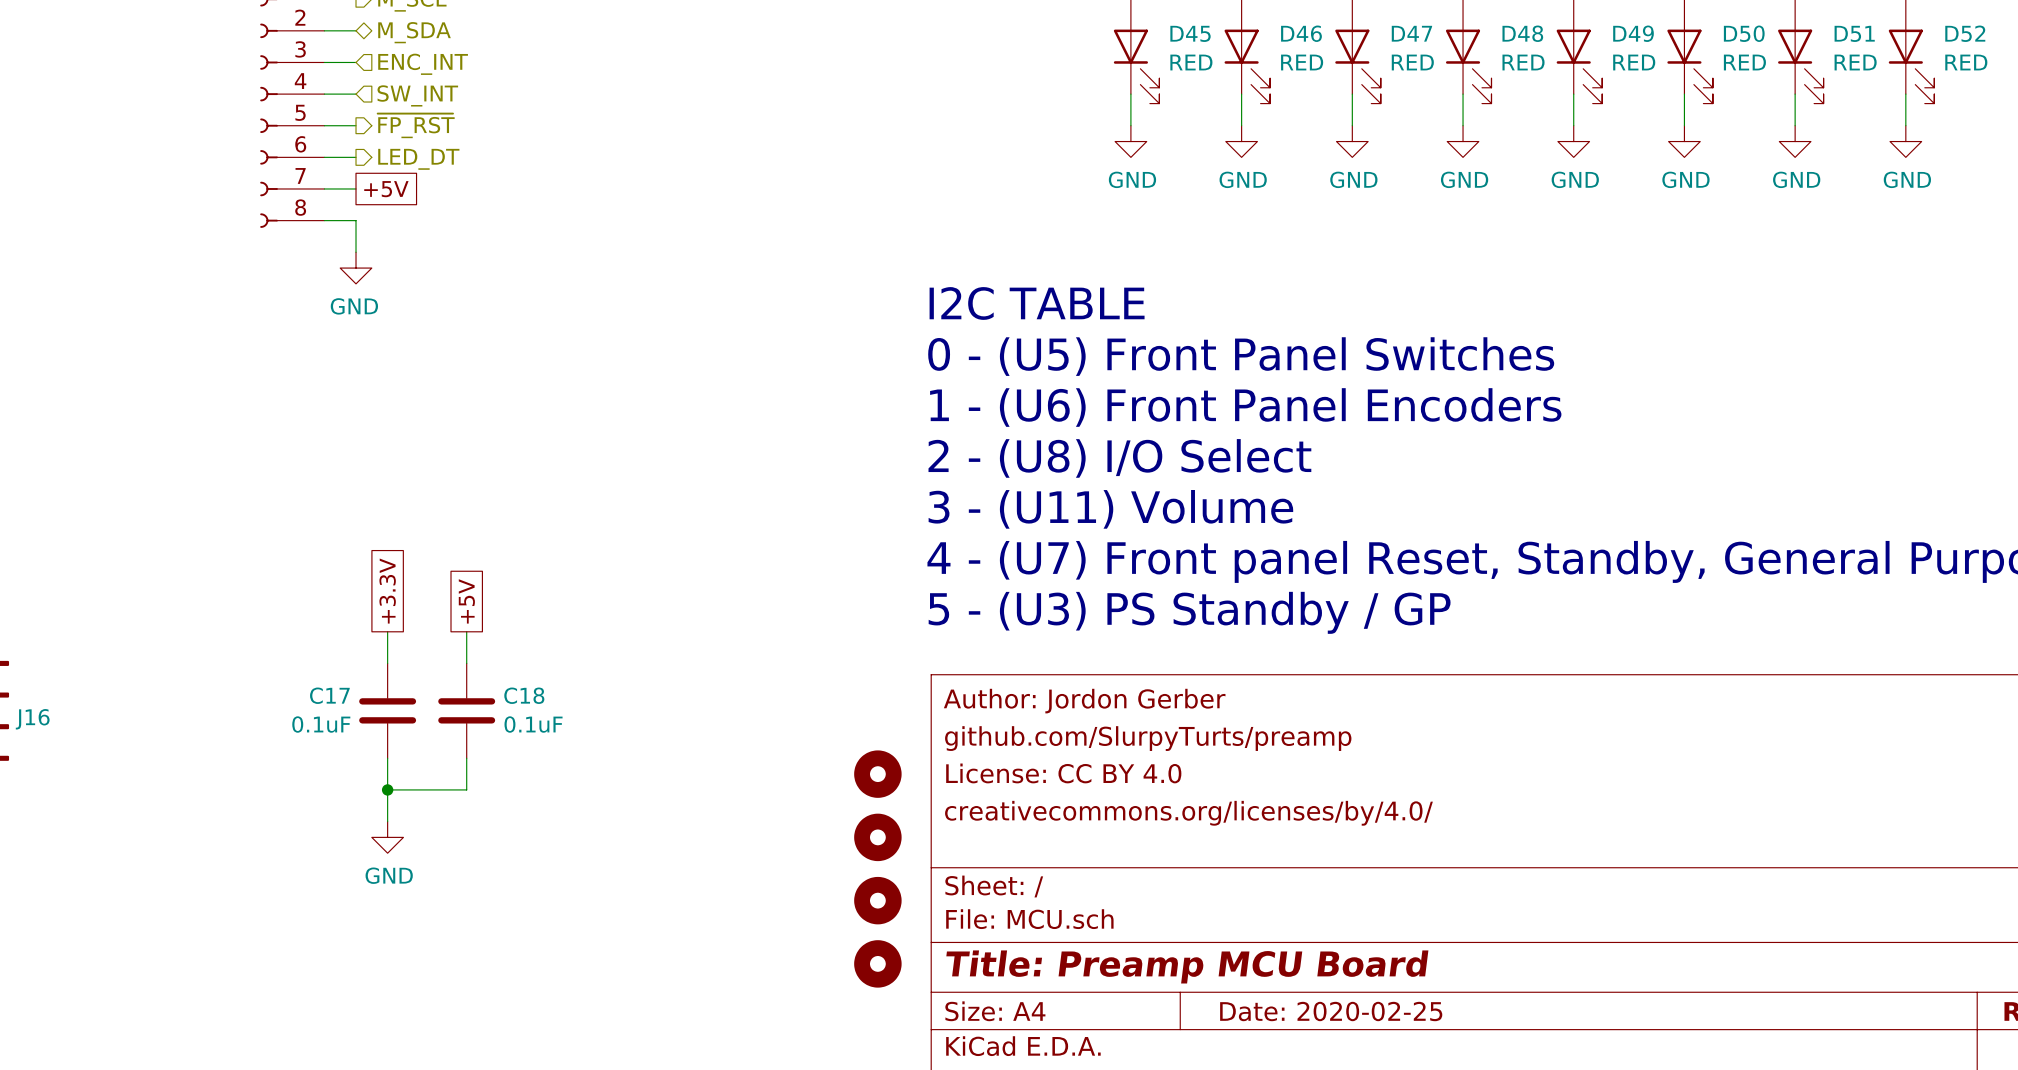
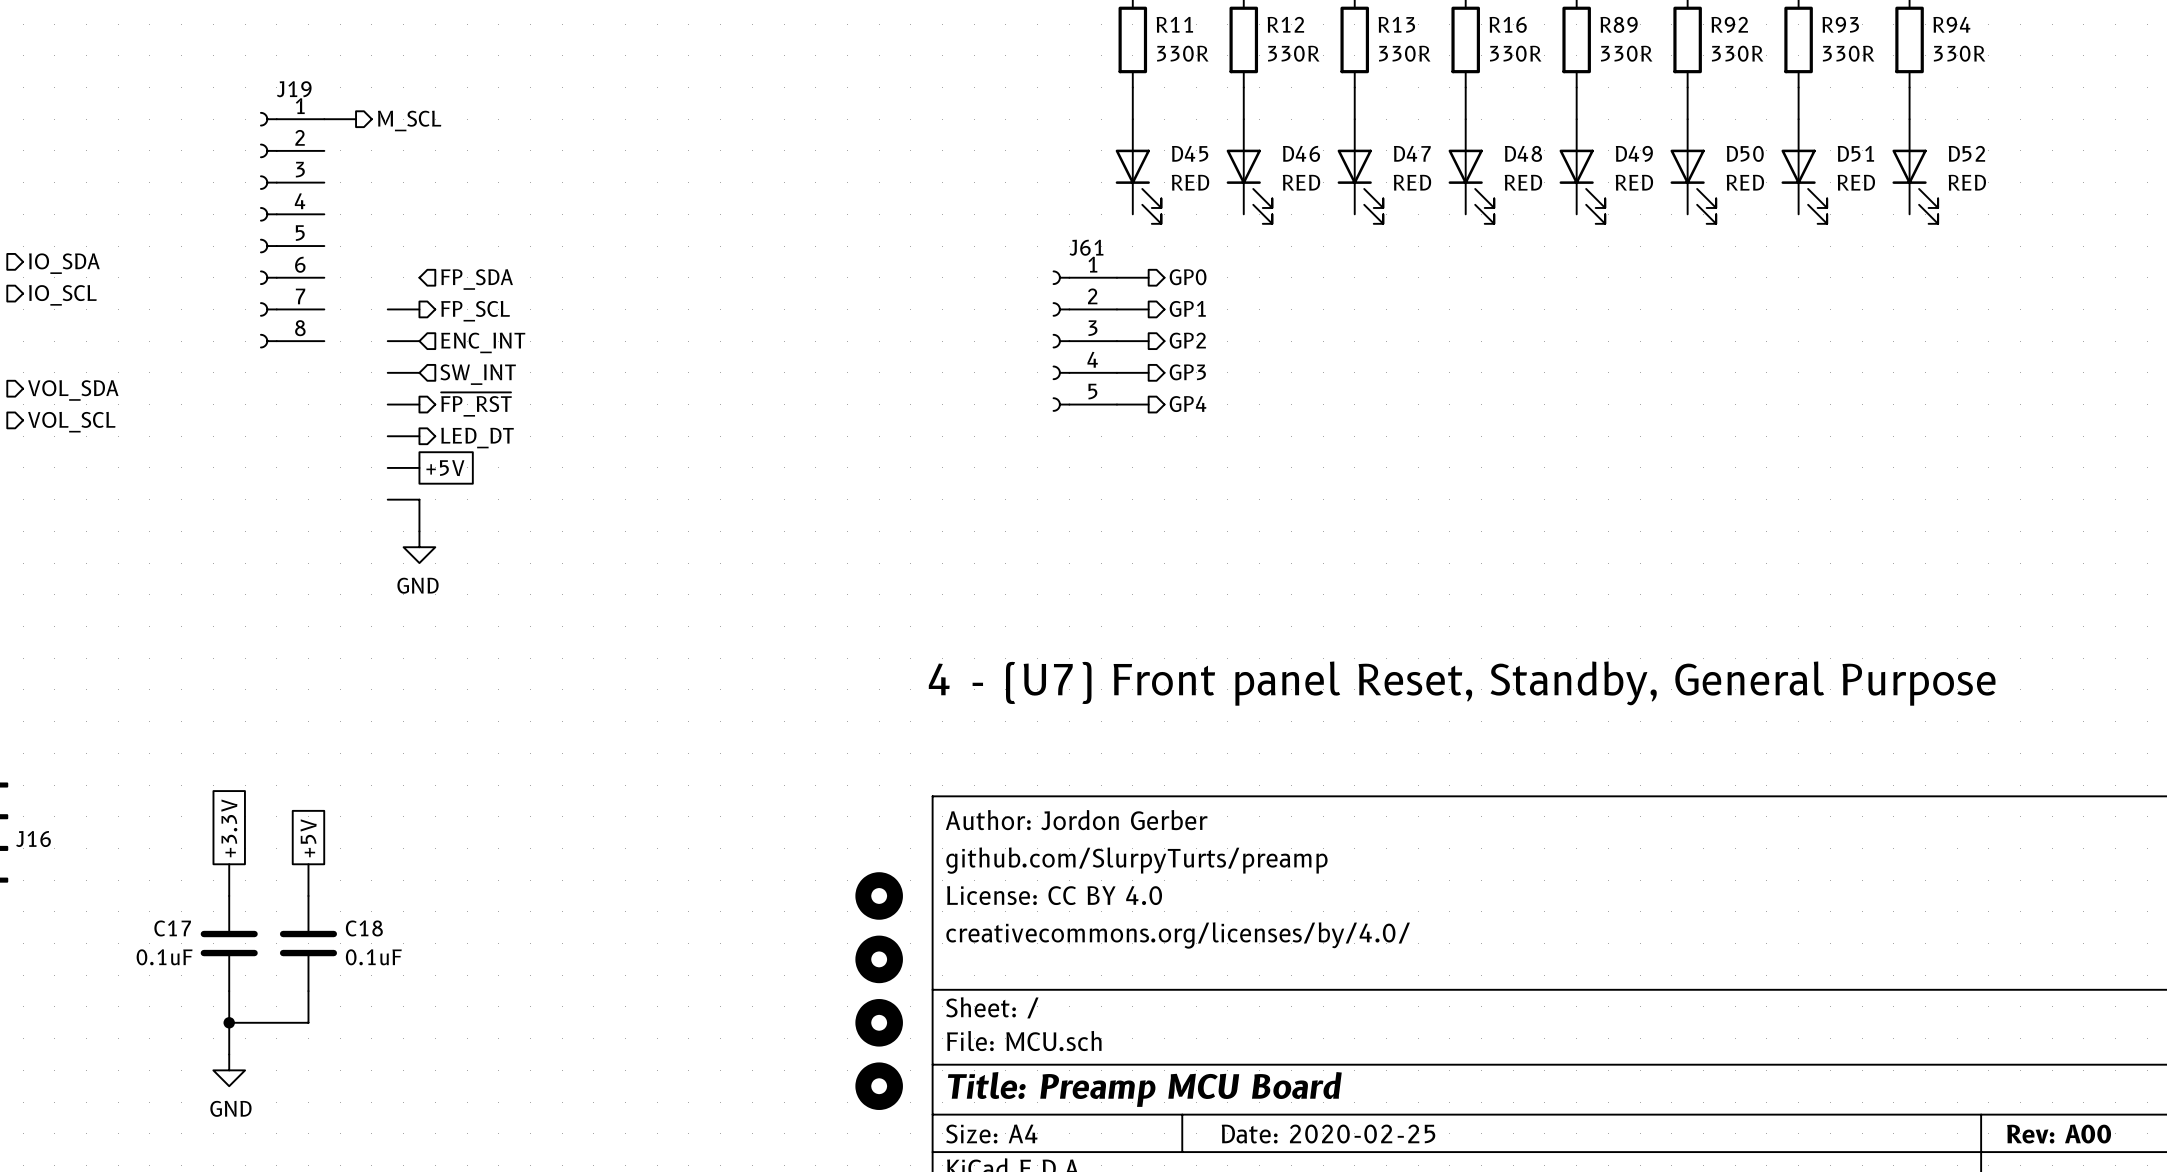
wire: (324, 30) (356, 30) -> (387, 309) (419, 309)
hierarchical label: M_SDA (414, 32) -> none
wire: (324, 62) (356, 62) -> (387, 341) (419, 341)
hierarchical label position: ENC_INT (423, 64) -> ENC_INT (483, 342)
wire: (324, 94) (356, 94) -> (387, 372) (419, 372)
wire: (1130, 94) (1130, 125) -> none
wire: (1241, 94) (1241, 125) -> none
wire: (1352, 94) (1352, 125) -> none
wire: (1463, 94) (1463, 125) -> none
wire: (1573, 94) (1573, 125) -> none
wire: (1684, 94) (1684, 125) -> none
wire: (1795, 94) (1795, 125) -> none
wire: (1905, 94) (1905, 125) -> none
hierarchical label position: SW_INT (417, 95) -> SW_INT (478, 374)
wire: (324, 125) (356, 125) -> (387, 404) (419, 404)
hierarchical label position: ~{FP_RST} (416, 125) -> ~{FP_RST} (476, 404)
power symbol: GND (1130, 141) -> none
power symbol: GND (1241, 141) -> none
power symbol: GND (1352, 141) -> none
power symbol: GND (1463, 141) -> none
power symbol: GND (1573, 141) -> none
power symbol: GND (1684, 141) -> none
power symbol: GND (1795, 141) -> none
power symbol: GND (1905, 141) -> none
hierarchical label: none -> IO_SDA (64, 263)
hierarchical label: none -> GP0 (1188, 277)
wire: (324, 157) (356, 157) -> (387, 436) (419, 436)
wire: none -> (1116, 277) (1148, 277)
hierarchical label position: LED_DT (418, 159) -> LED_DT (477, 438)
hierarchical label: none -> FP_SDA (477, 279)
hierarchical label: none -> IO_SCL (62, 295)
wire: (324, 188) (356, 188) -> (387, 467) (419, 467)
wire: none -> (1116, 309) (1148, 309)
hierarchical label: none -> GP1 (1187, 308)
global label: +5V (386, 189) -> none
hierarchical label: none -> FP_SCL (475, 311)
wire: (324, 220) (356, 220) (356, 252) -> (387, 499) (419, 499) (419, 531)
J61: none -> (1084, 341)
wire: none -> (1116, 341) (1148, 341)
hierarchical label: none -> GP2 (1187, 340)
hierarchical label: none -> GP3 (1187, 372)
wire: none -> (1116, 372) (1148, 372)
power symbol position: GND (356, 268) -> GND (419, 547)
hierarchical label: none -> VOL_SDA (73, 390)
wire: none -> (1116, 404) (1148, 404)
hierarchical label: none -> GP4 (1188, 404)
hierarchical label: none -> VOL_SCL (71, 422)
text: I2C TABLE (1037, 303) -> none
global label: none -> +5V (445, 468)
text: 0 - (U5) Front Panel Switches (1241, 356) -> none
text: 1 - (U6) Front Panel Encoders (1245, 407) -> none
text: 2 - (U8) I/O Select (1119, 458) -> none
text: 3 - (U11) Volume (1110, 509) -> none
global label position: +3.3V (387, 591) -> +3.3V (229, 828)
global label: +5V (466, 601) -> none
text: 5 - (U3) PS Standby / GP (1189, 612) -> none
wire: (387, 631) (387, 663) -> (229, 864) (229, 895)
wire: (466, 631) (466, 663) -> (308, 864) (308, 895)
C17 position: (387, 710) -> (229, 943)
C18 position: (466, 710) -> (308, 943)
global label: none -> +5V (308, 838)
wire: (387, 758) (387, 821) -> (229, 991) (229, 1054)
wire: (466, 758) (466, 789) (387, 789) -> (308, 991) (308, 1022) (229, 1022)
junction: (387, 789) -> none
power symbol position: GND (387, 837) -> GND (229, 1070)
junction: none -> (229, 1022)

